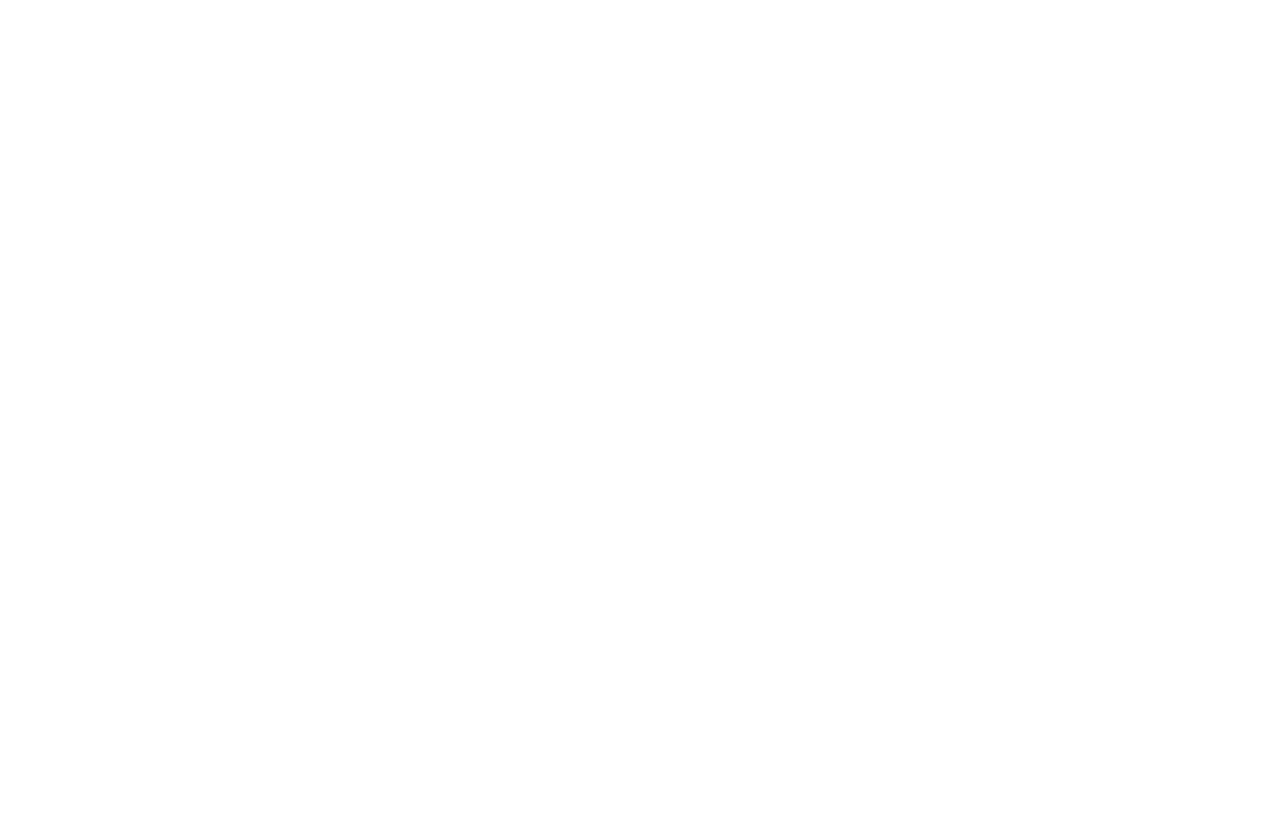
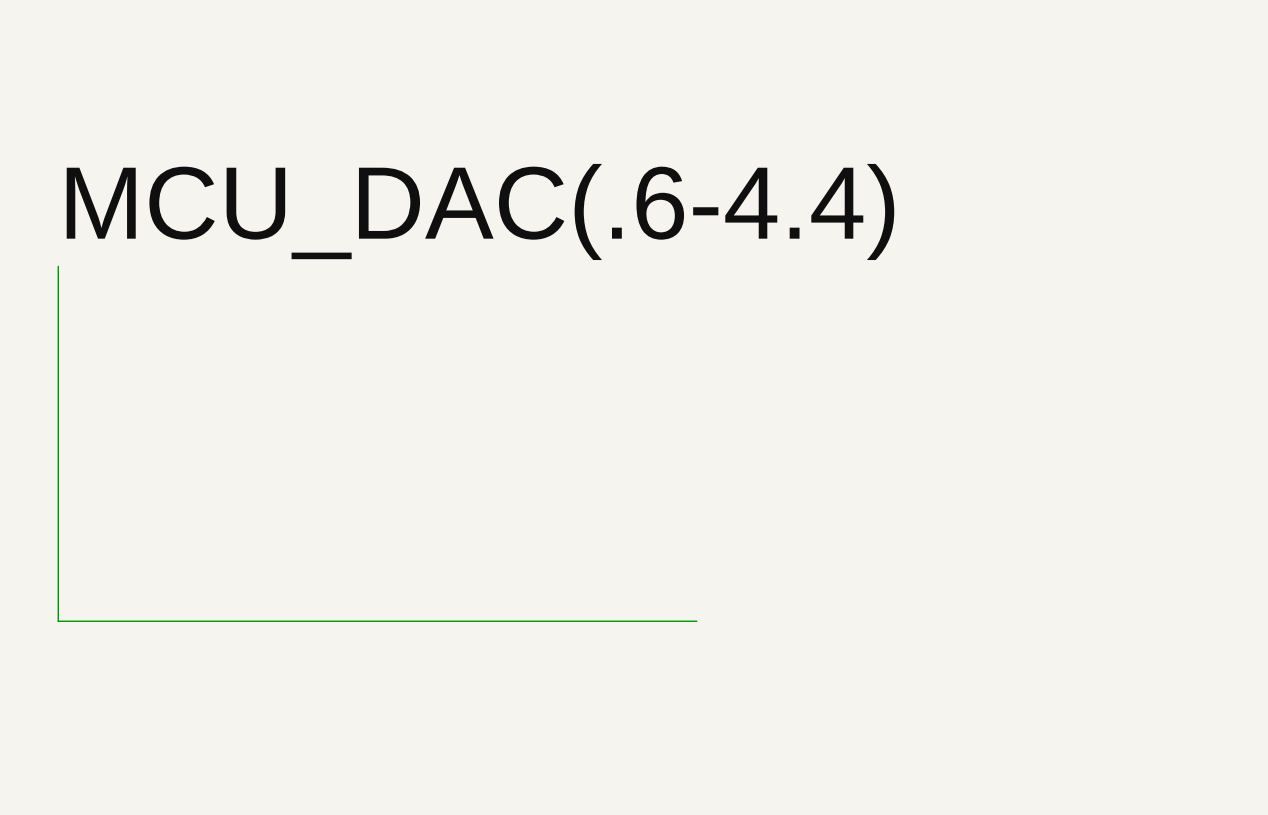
label: none -> MCU_DAC(.6-4.4) (480, 211)
wire: none -> (58, 266) (58, 621) (696, 621)

